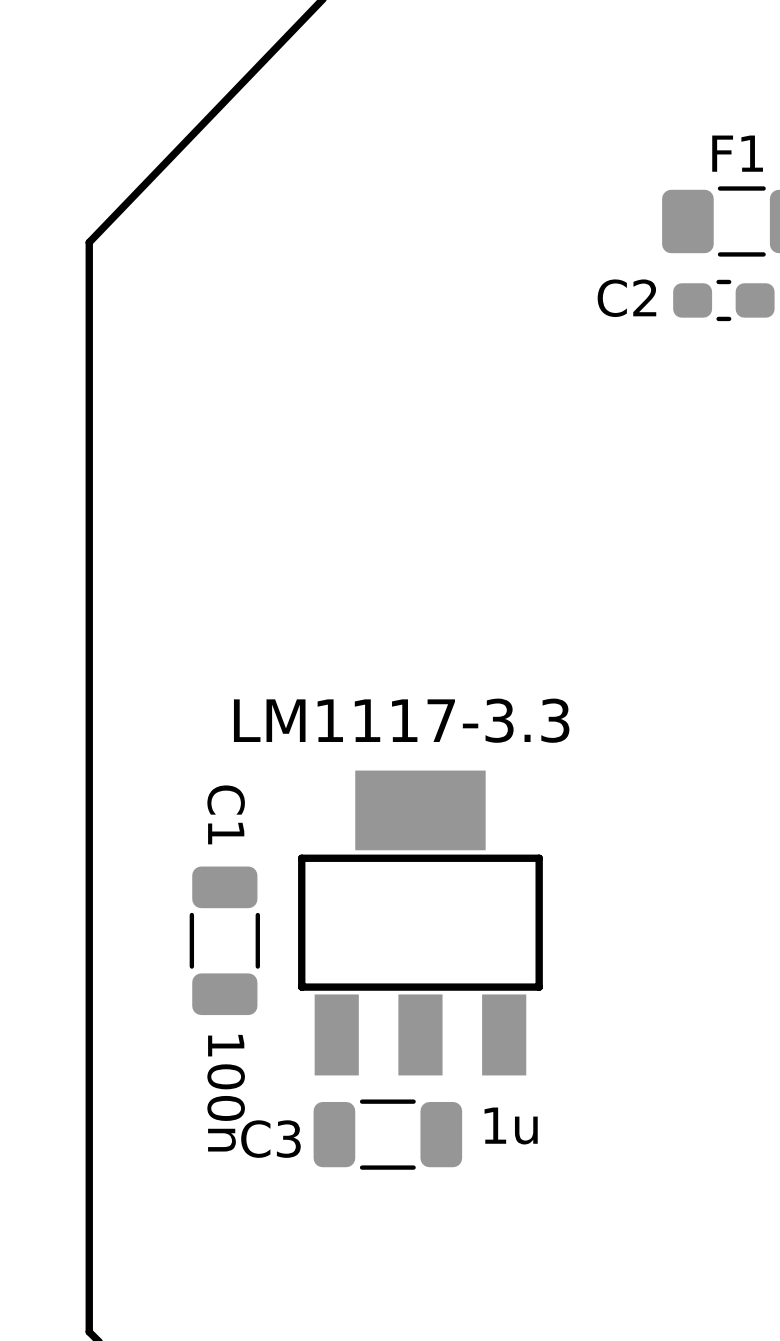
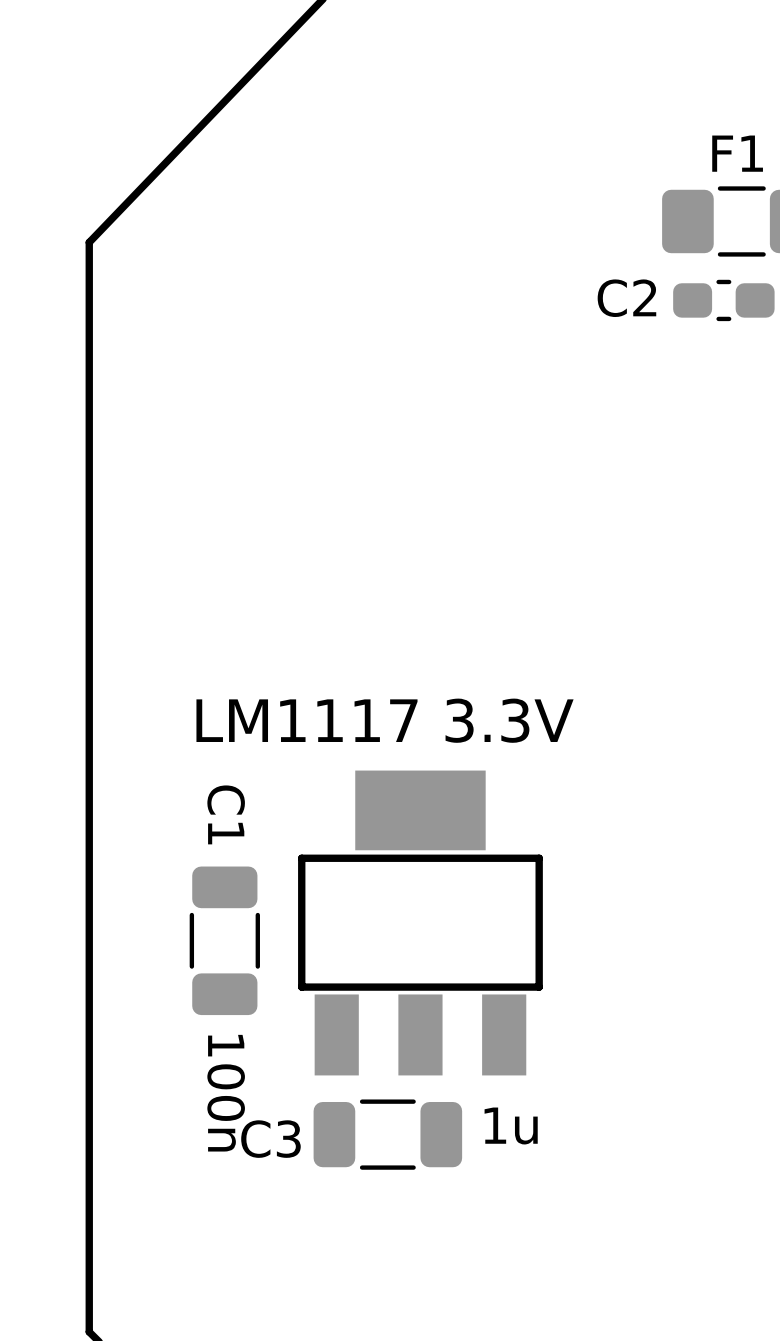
part value: LM1117-3.3 (401, 720) -> LM1117 3.3V (385, 720)

